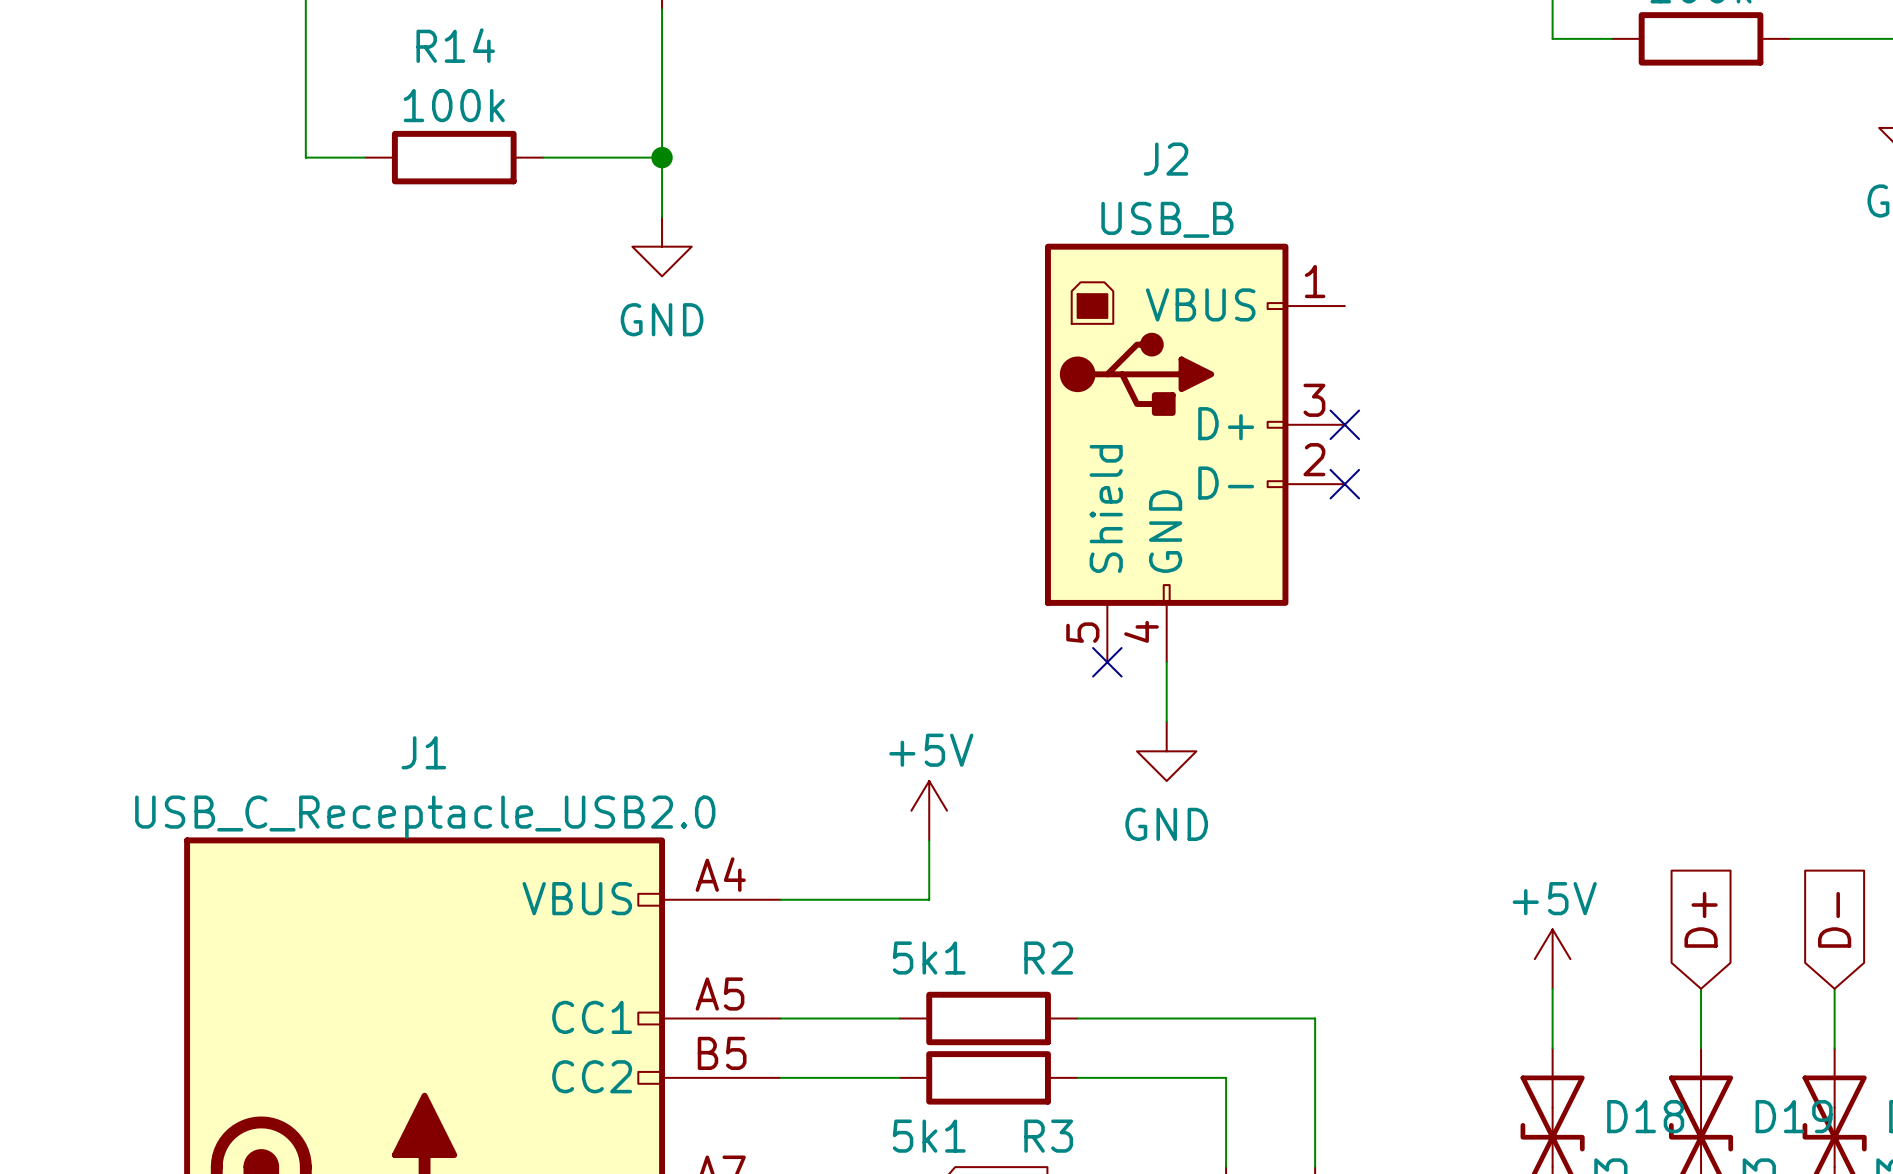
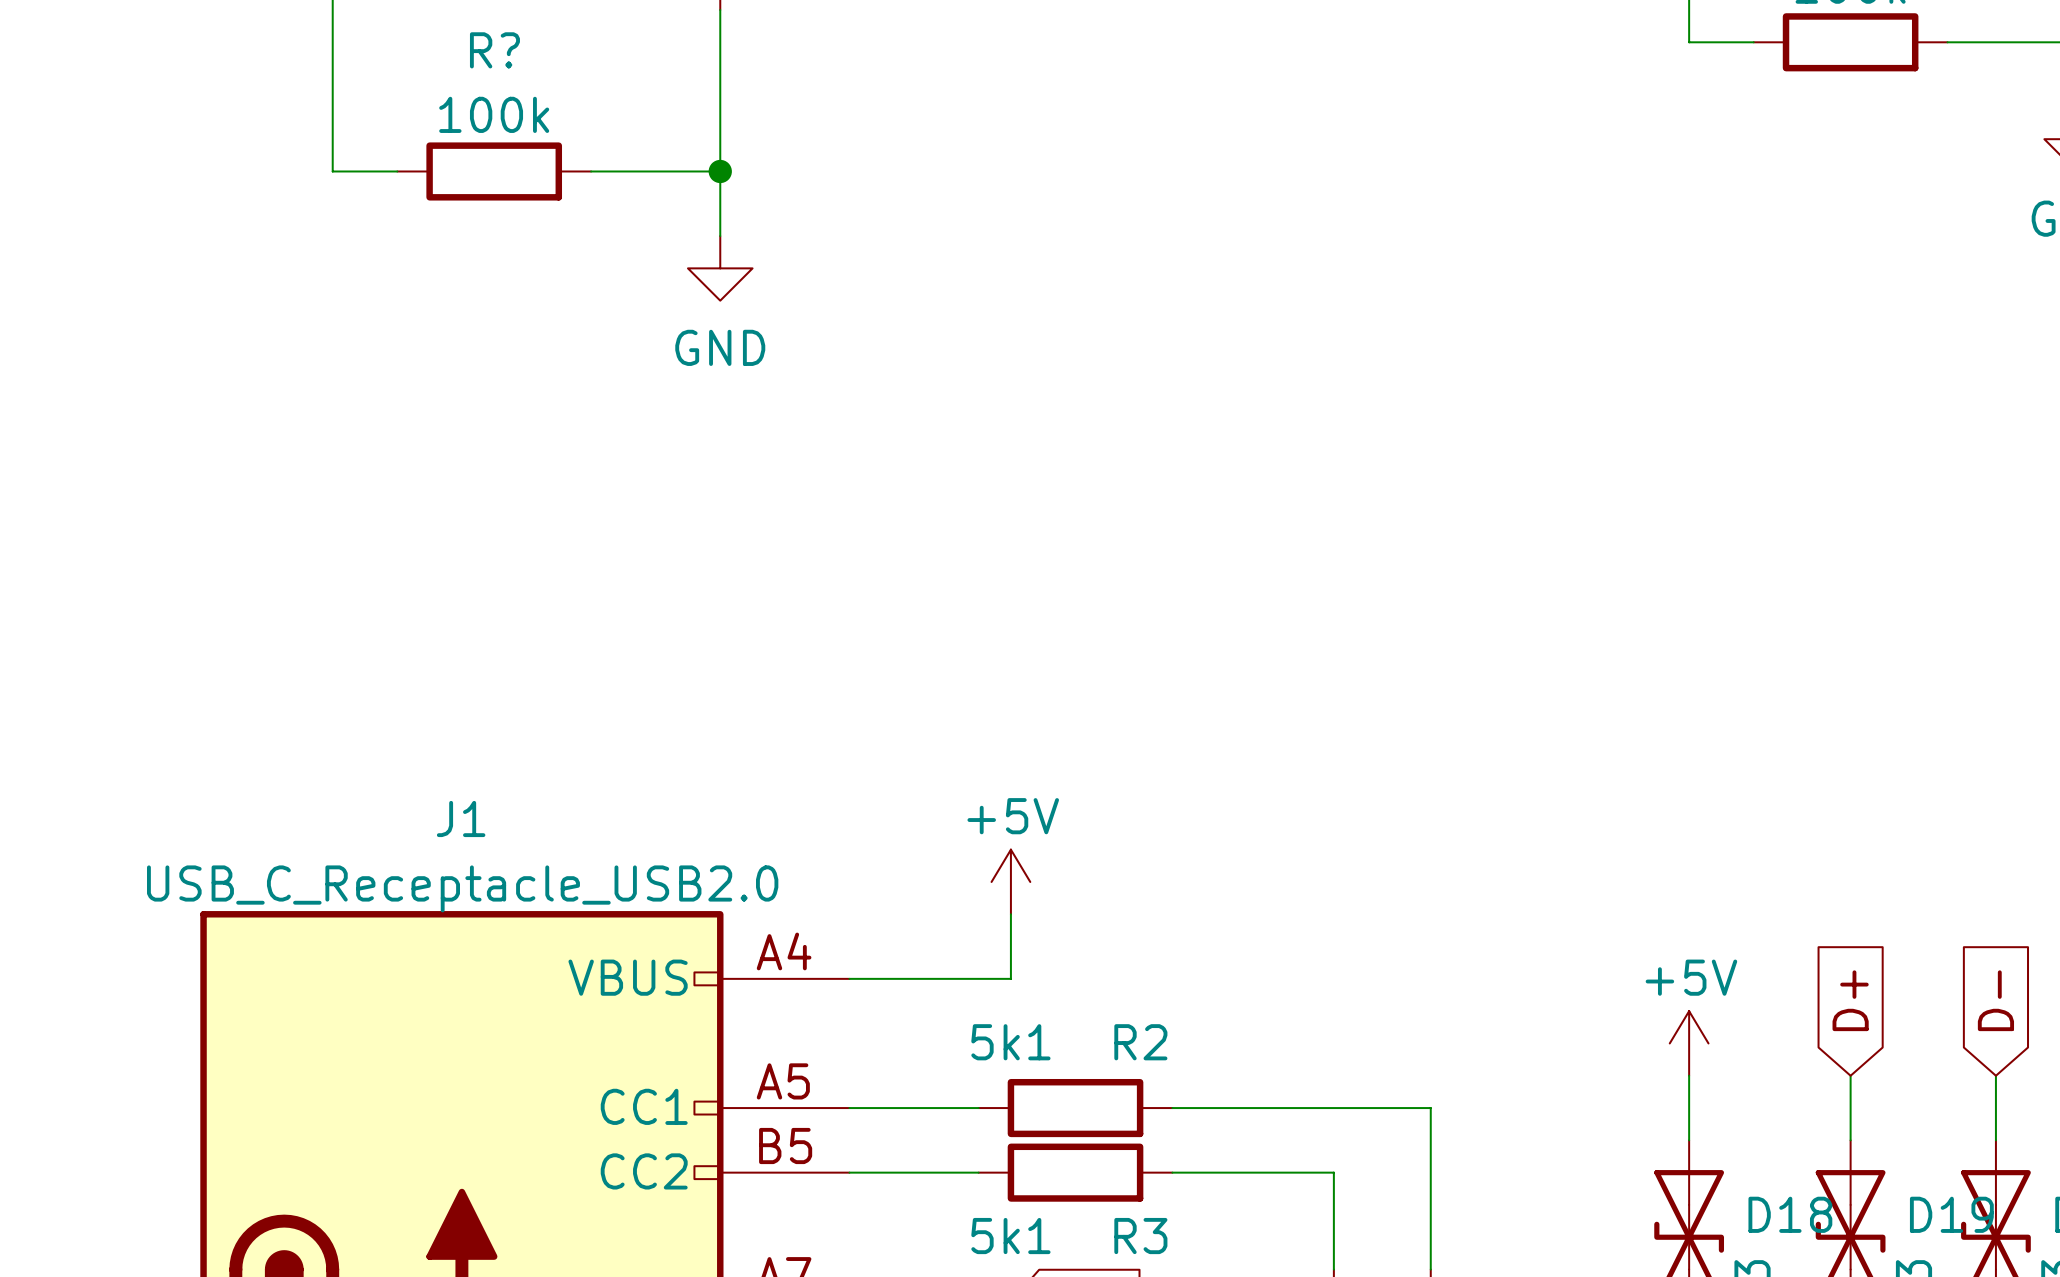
R14 name: R14 (455, 45) -> R? (494, 50)
no-connect mark: (1344, 424) -> none
J2: USB_B (1194, 452) -> none
no-connect mark: (1344, 484) -> none
no-connect mark: (1107, 662) -> none
wire: (1166, 662) (1166, 721) -> none
power symbol: GND (1166, 751) -> none

